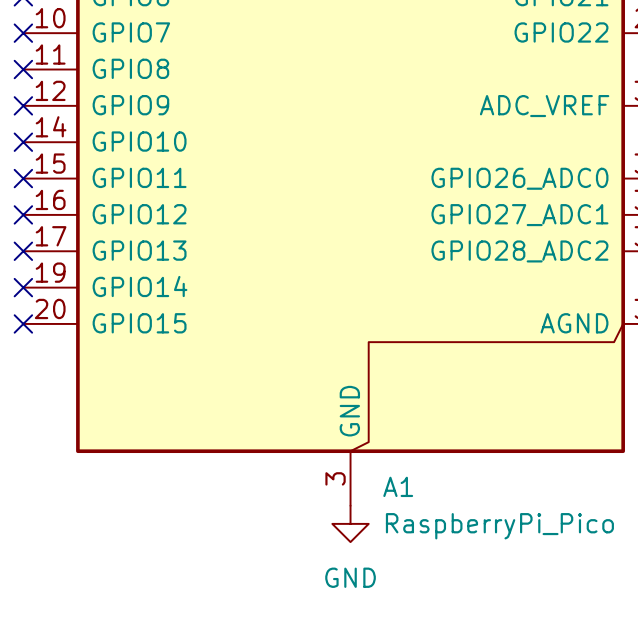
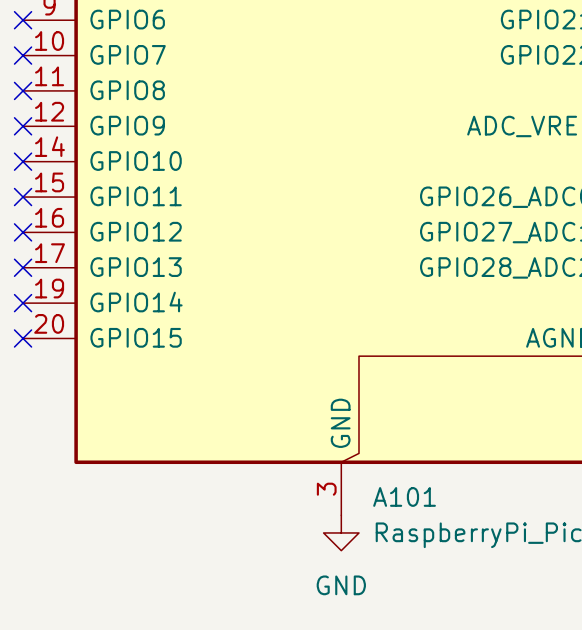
A1 name: A1 (398, 486) -> A101 (404, 496)

